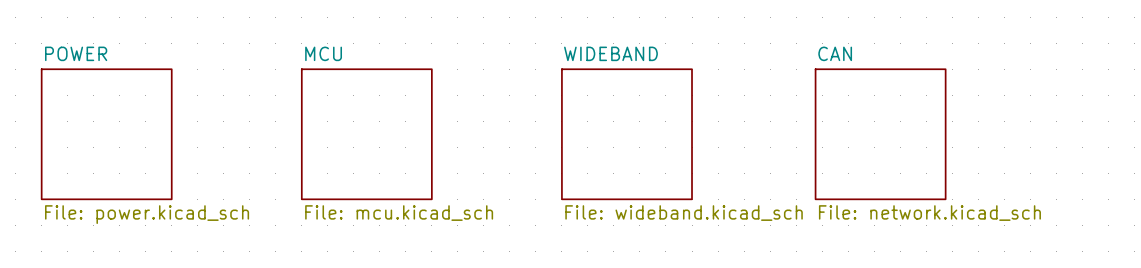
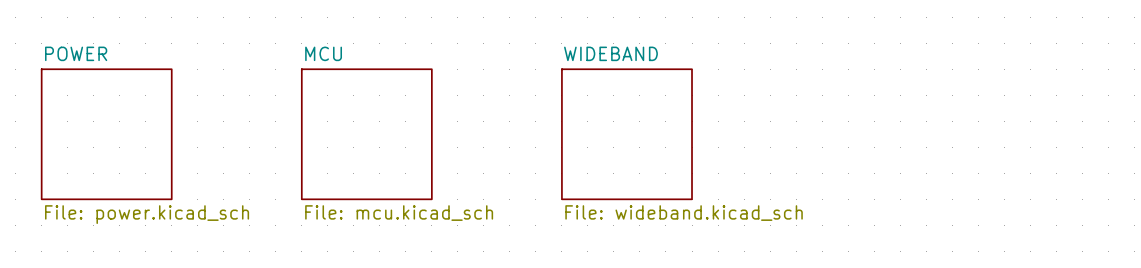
sheet CAN: File: network.kicad_sch (880, 134) -> none

